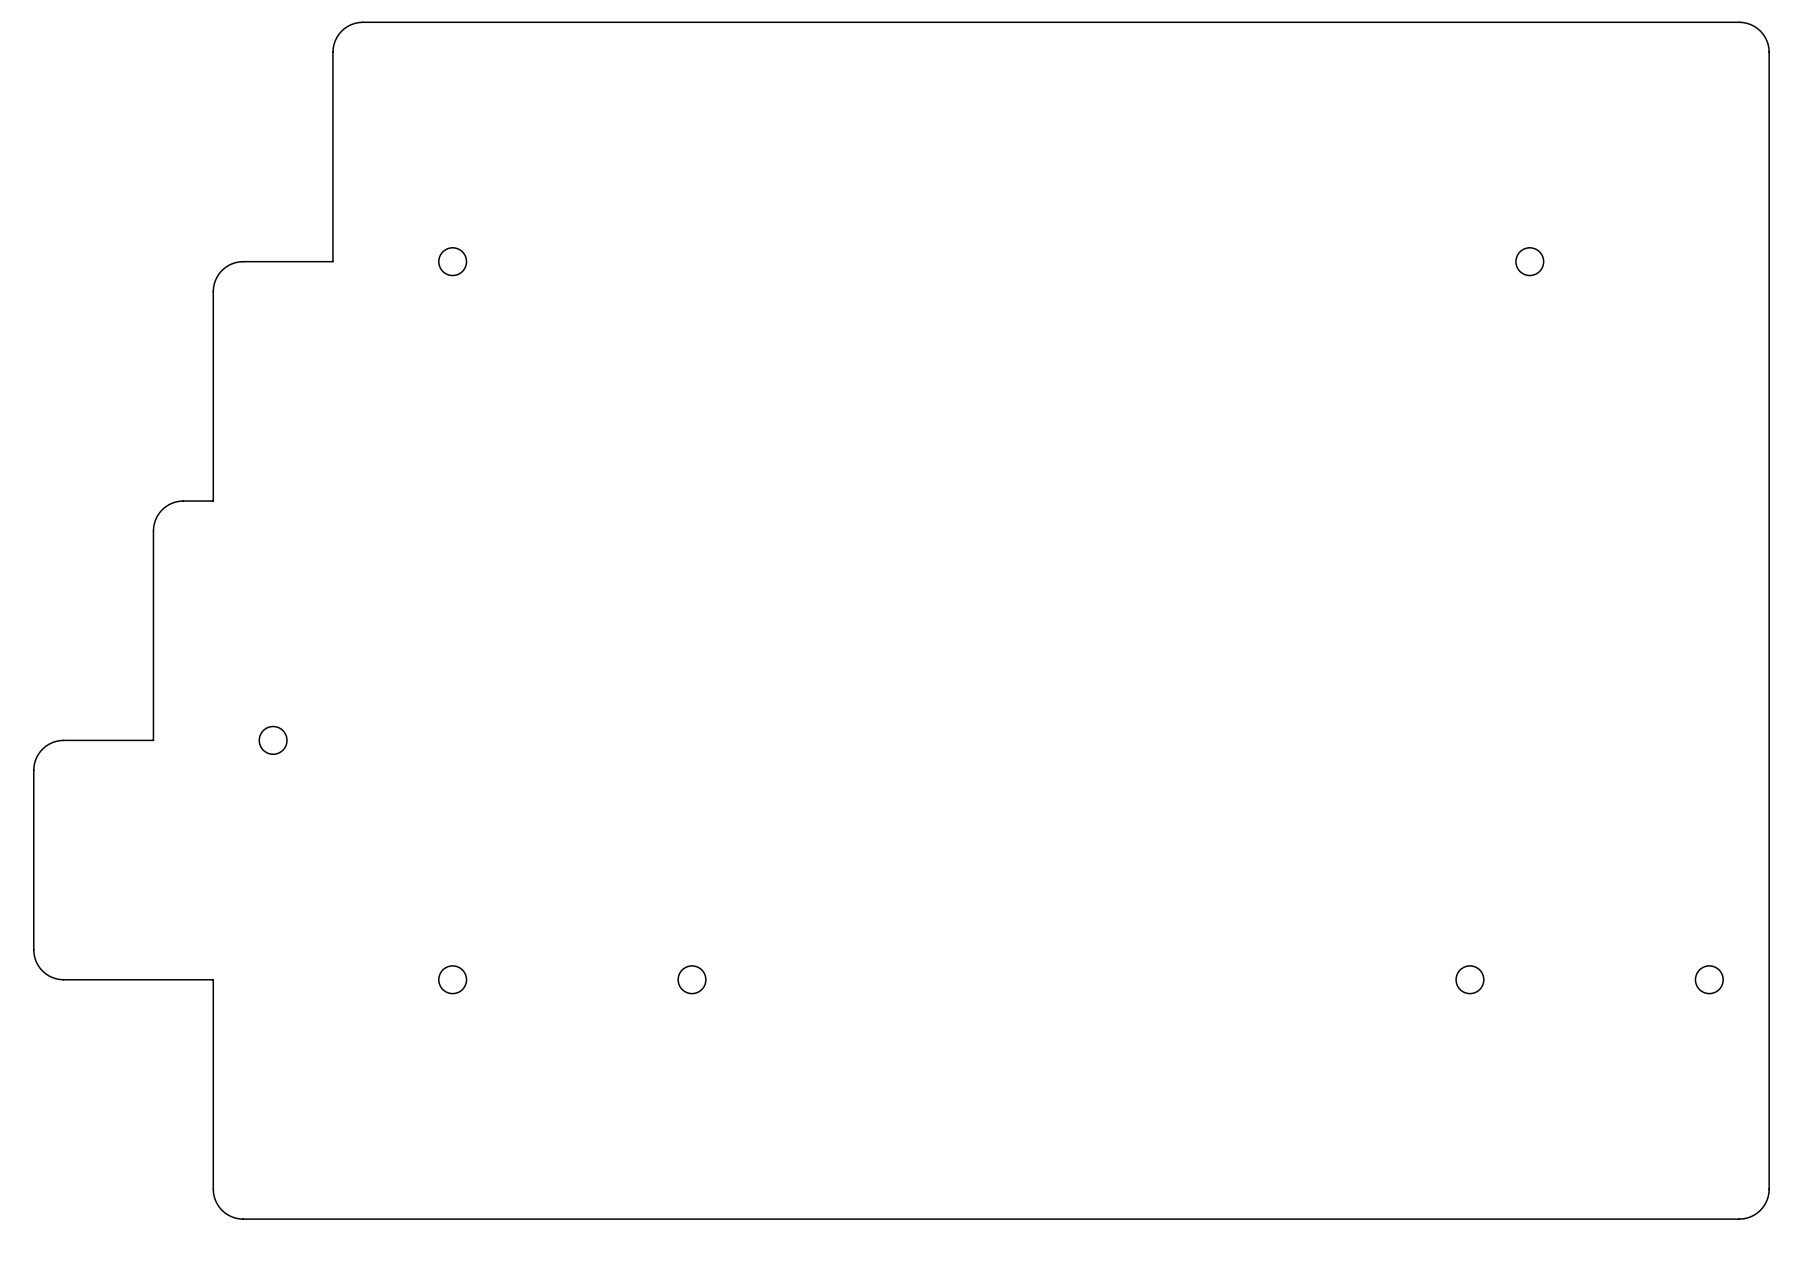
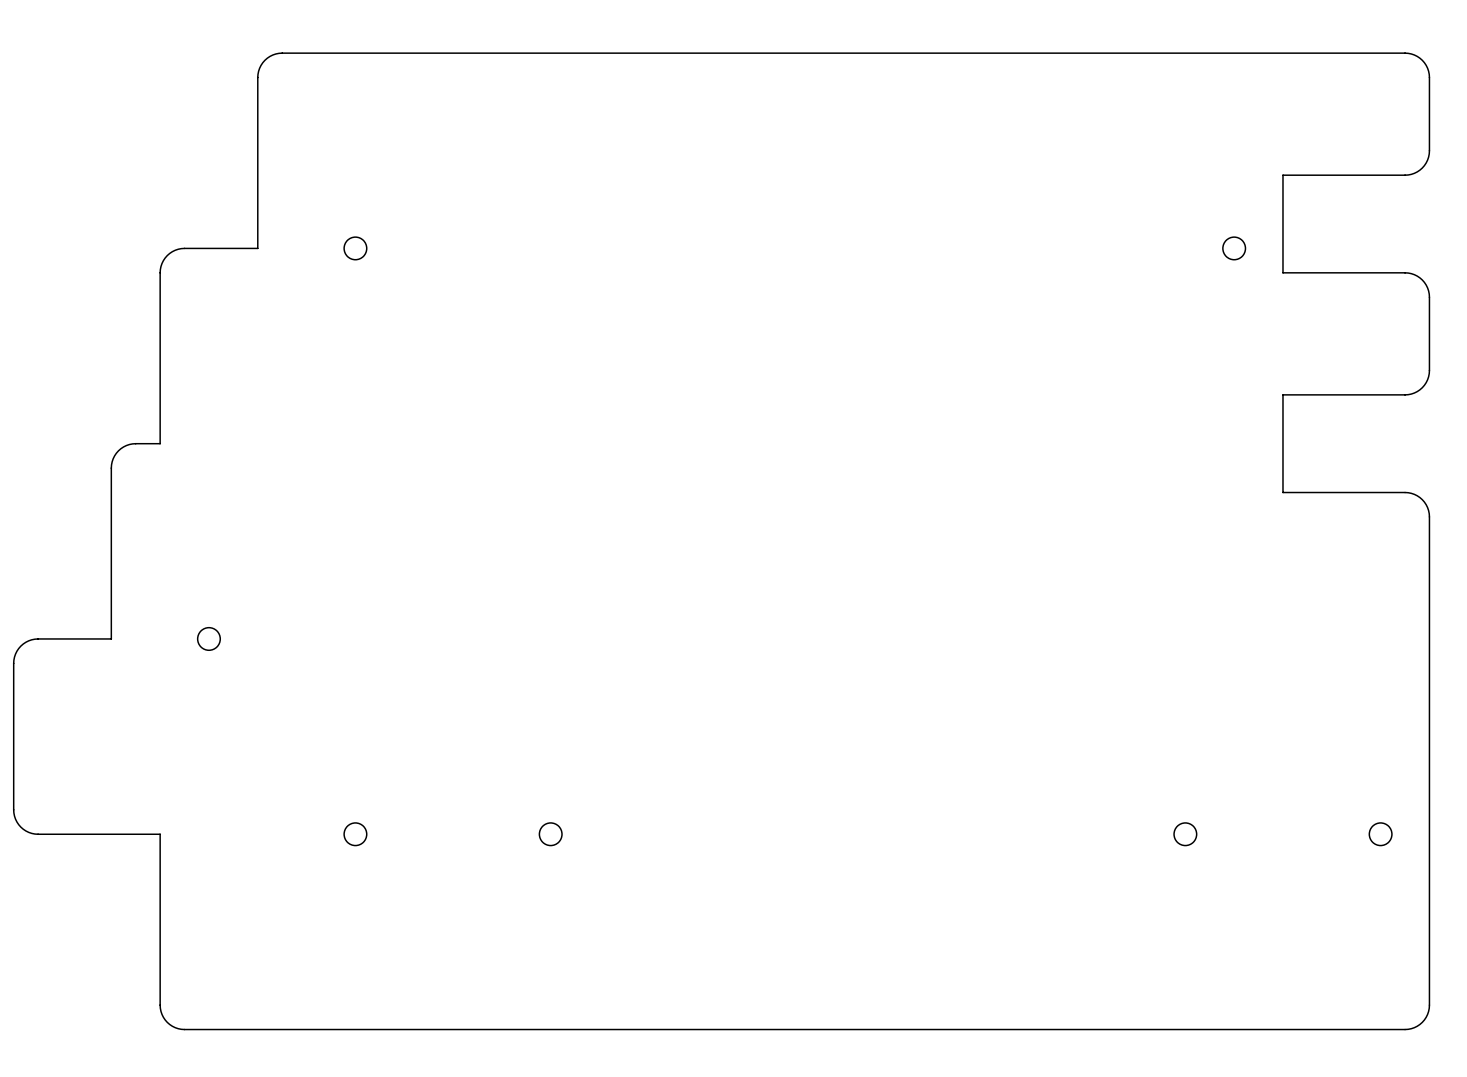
board edge: (1769, 141) (1769, 321) -> (1429, 150) (1424, 165) (1417, 171) (1408, 174) (1282, 175) (1282, 272) (1408, 273) (1417, 276) (1424, 282) (1429, 297)
board edge: (1769, 411) (1769, 590) -> (1429, 370) (1424, 385) (1417, 391) (1408, 394) (1282, 394) (1282, 492) (1408, 492) (1417, 495) (1424, 502) (1429, 516)

